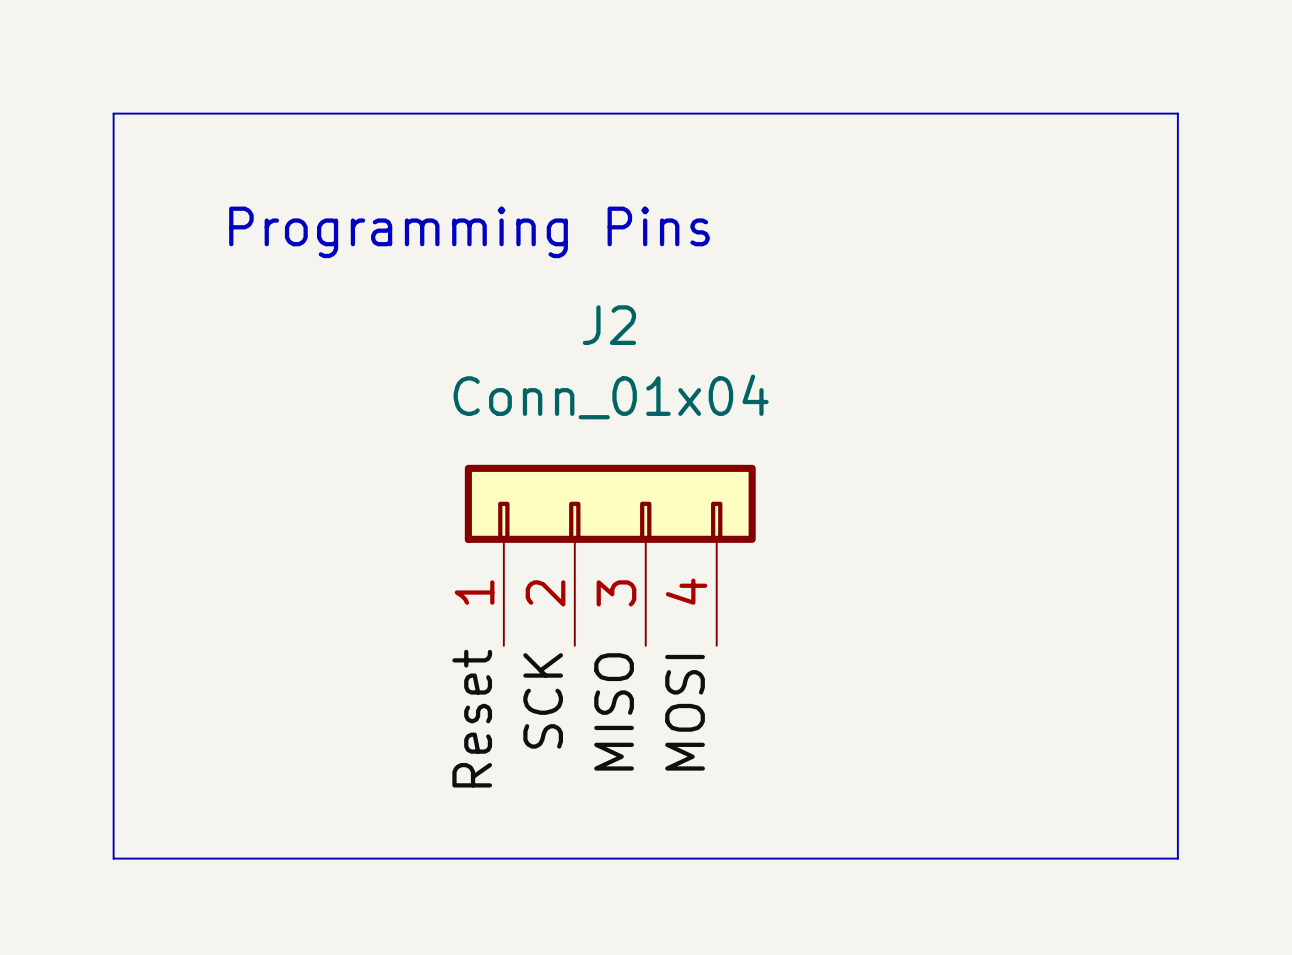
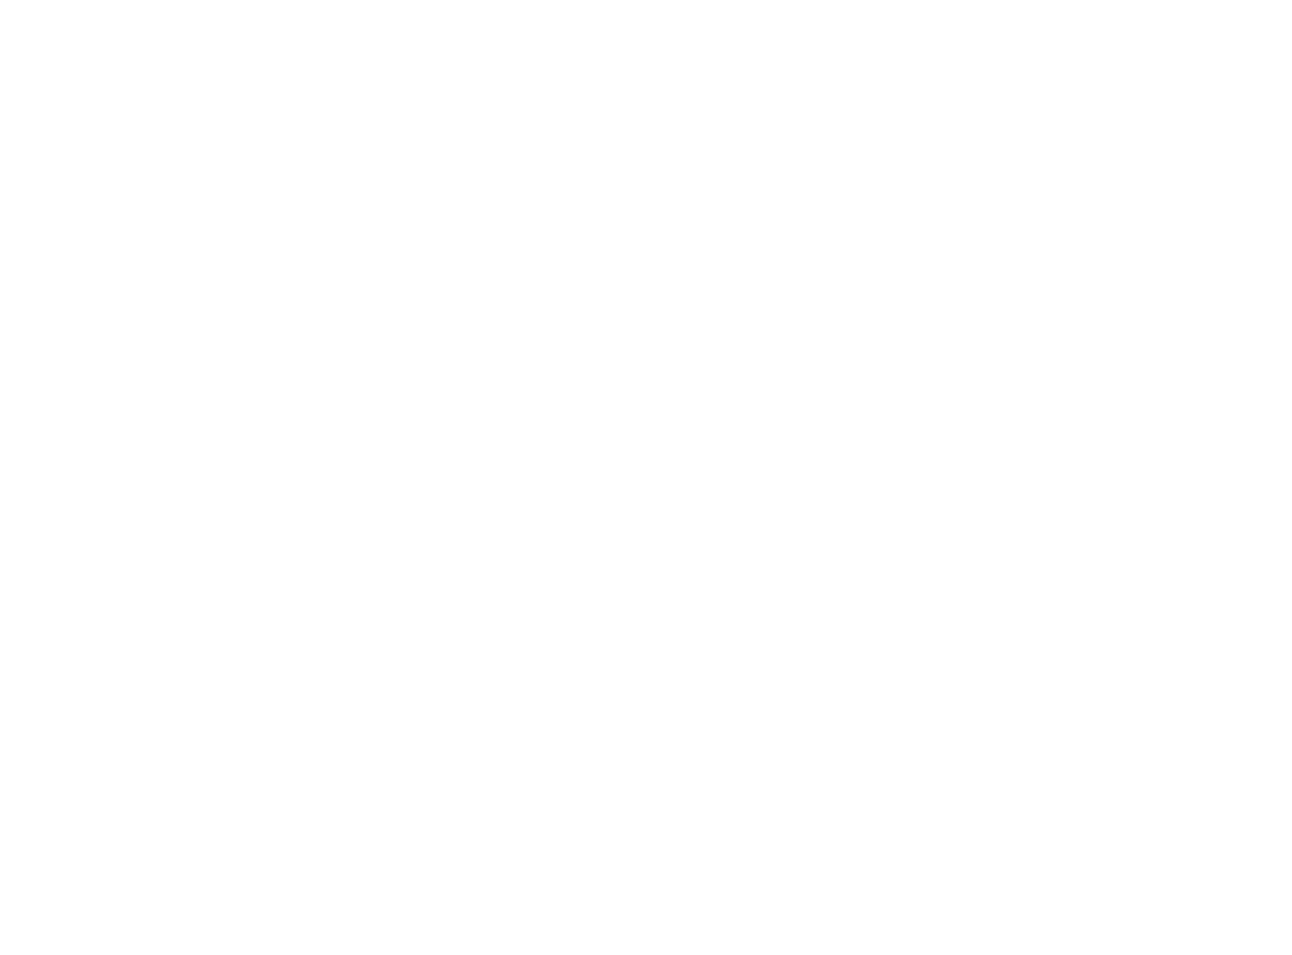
line: (113, 113) (1177, 113) (1177, 858) (113, 858) (113, 113) -> none
text: Programming Pins (469, 232) -> none
J2: Conn_01x04 (610, 555) -> none
label: SCK (543, 700) -> none
label: MISO (614, 711) -> none
label: MOSI (685, 712) -> none
label: Reset (472, 718) -> none

